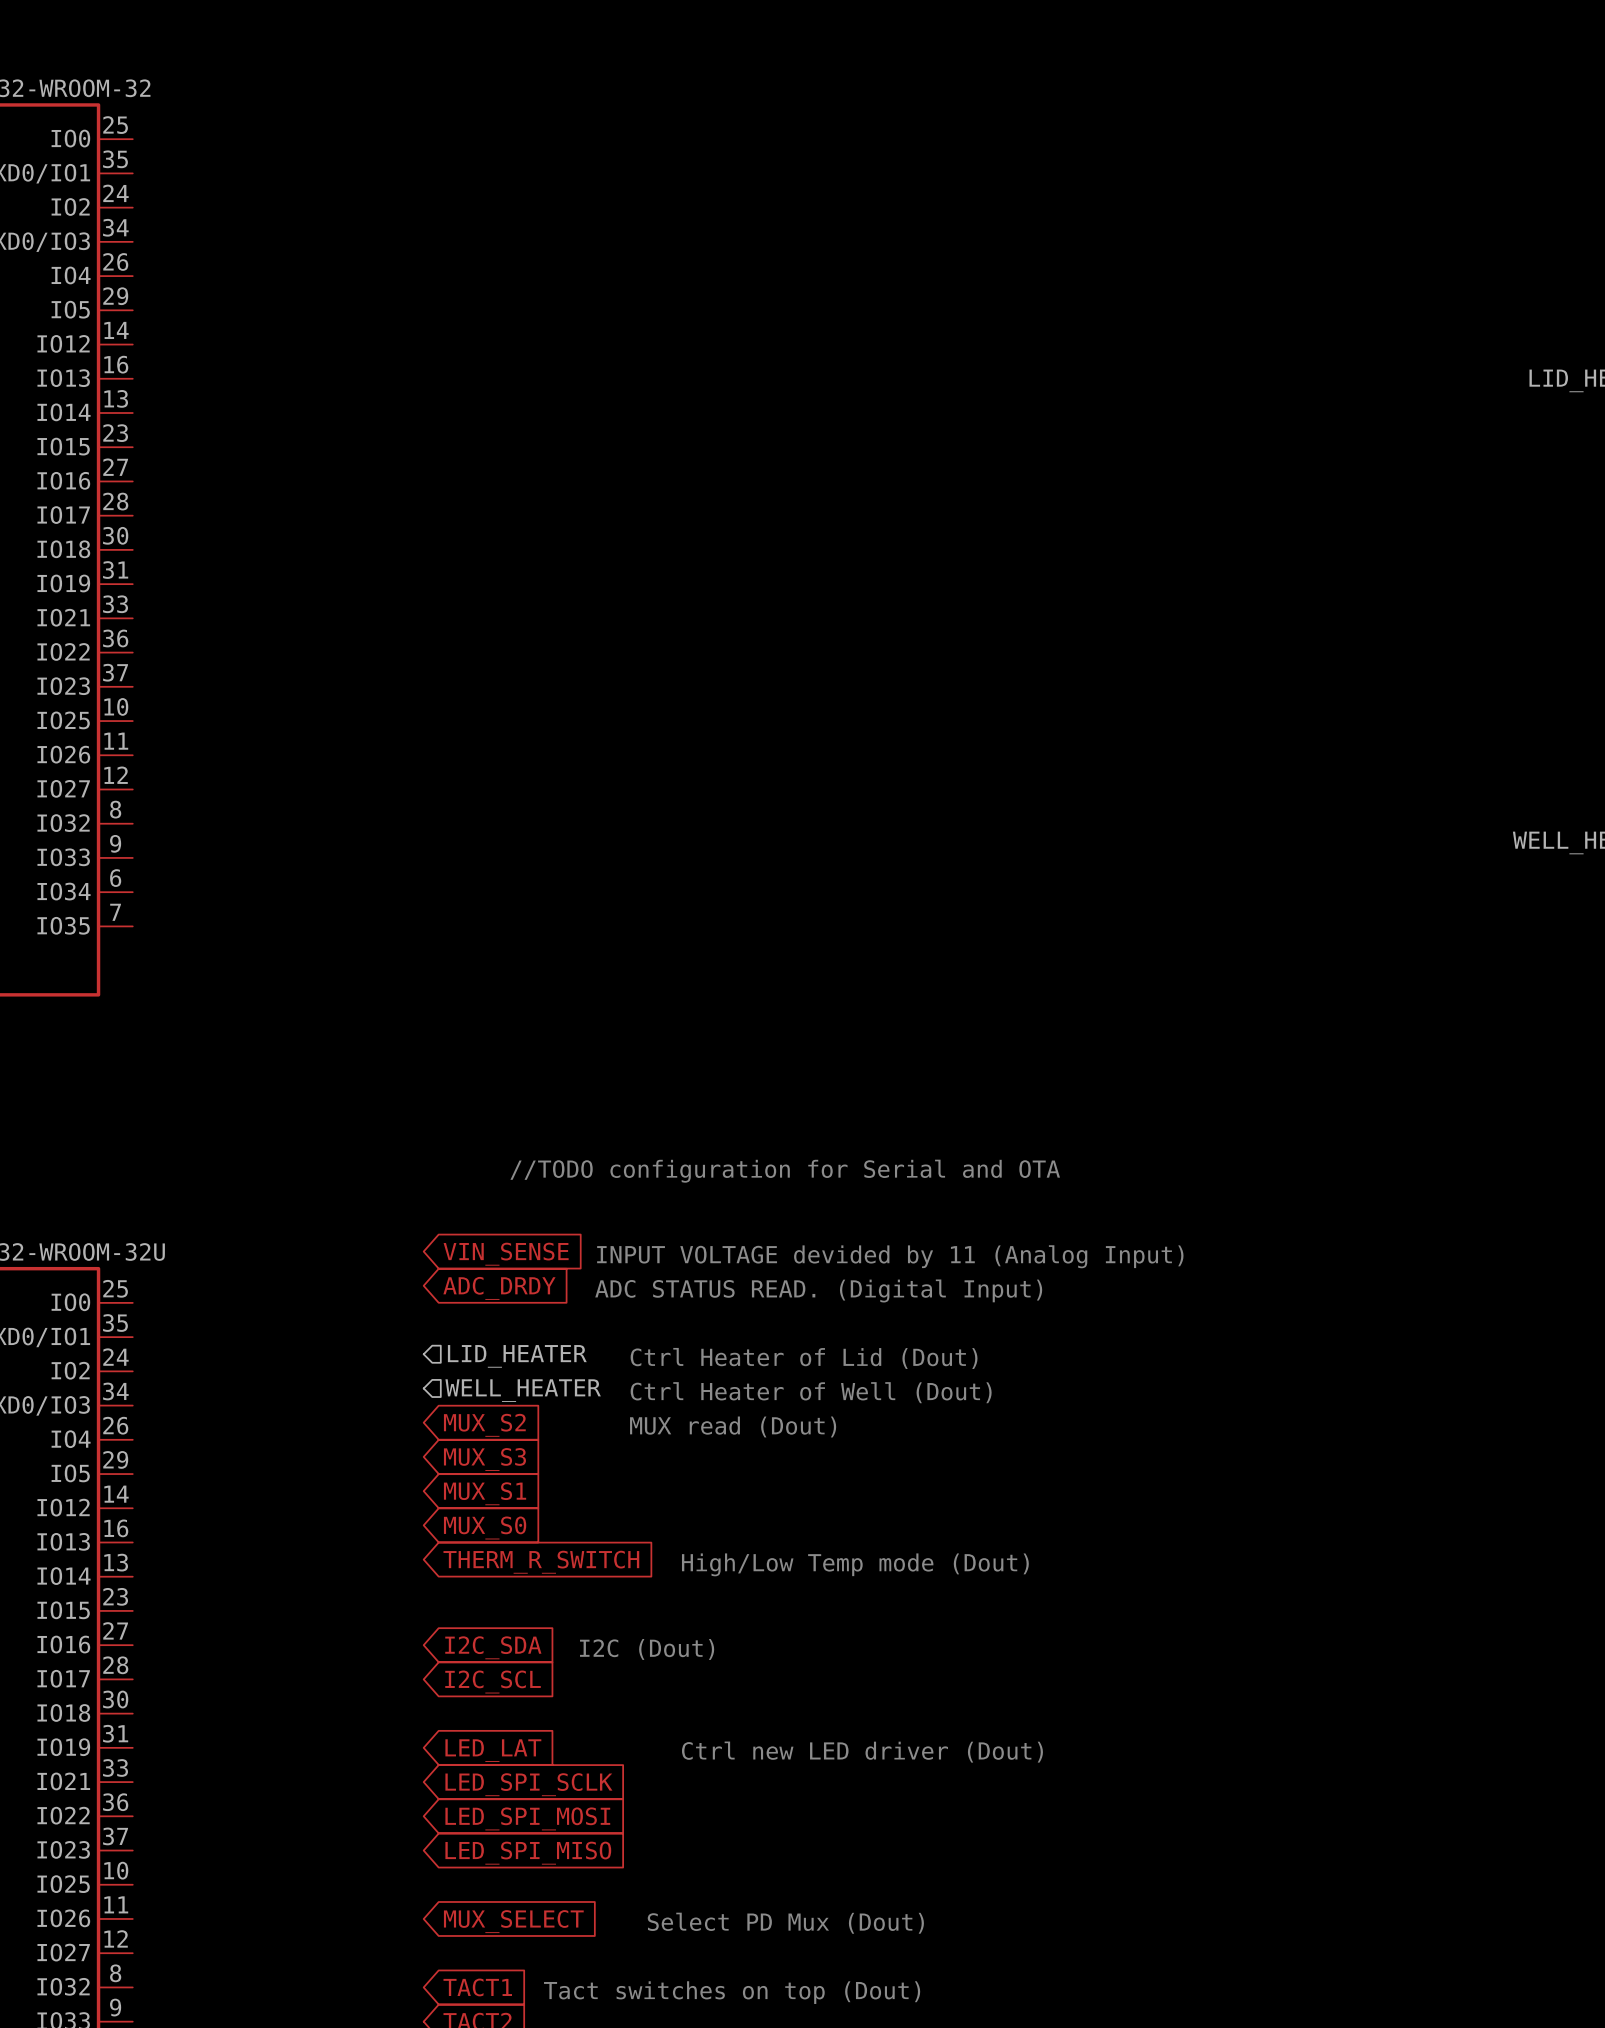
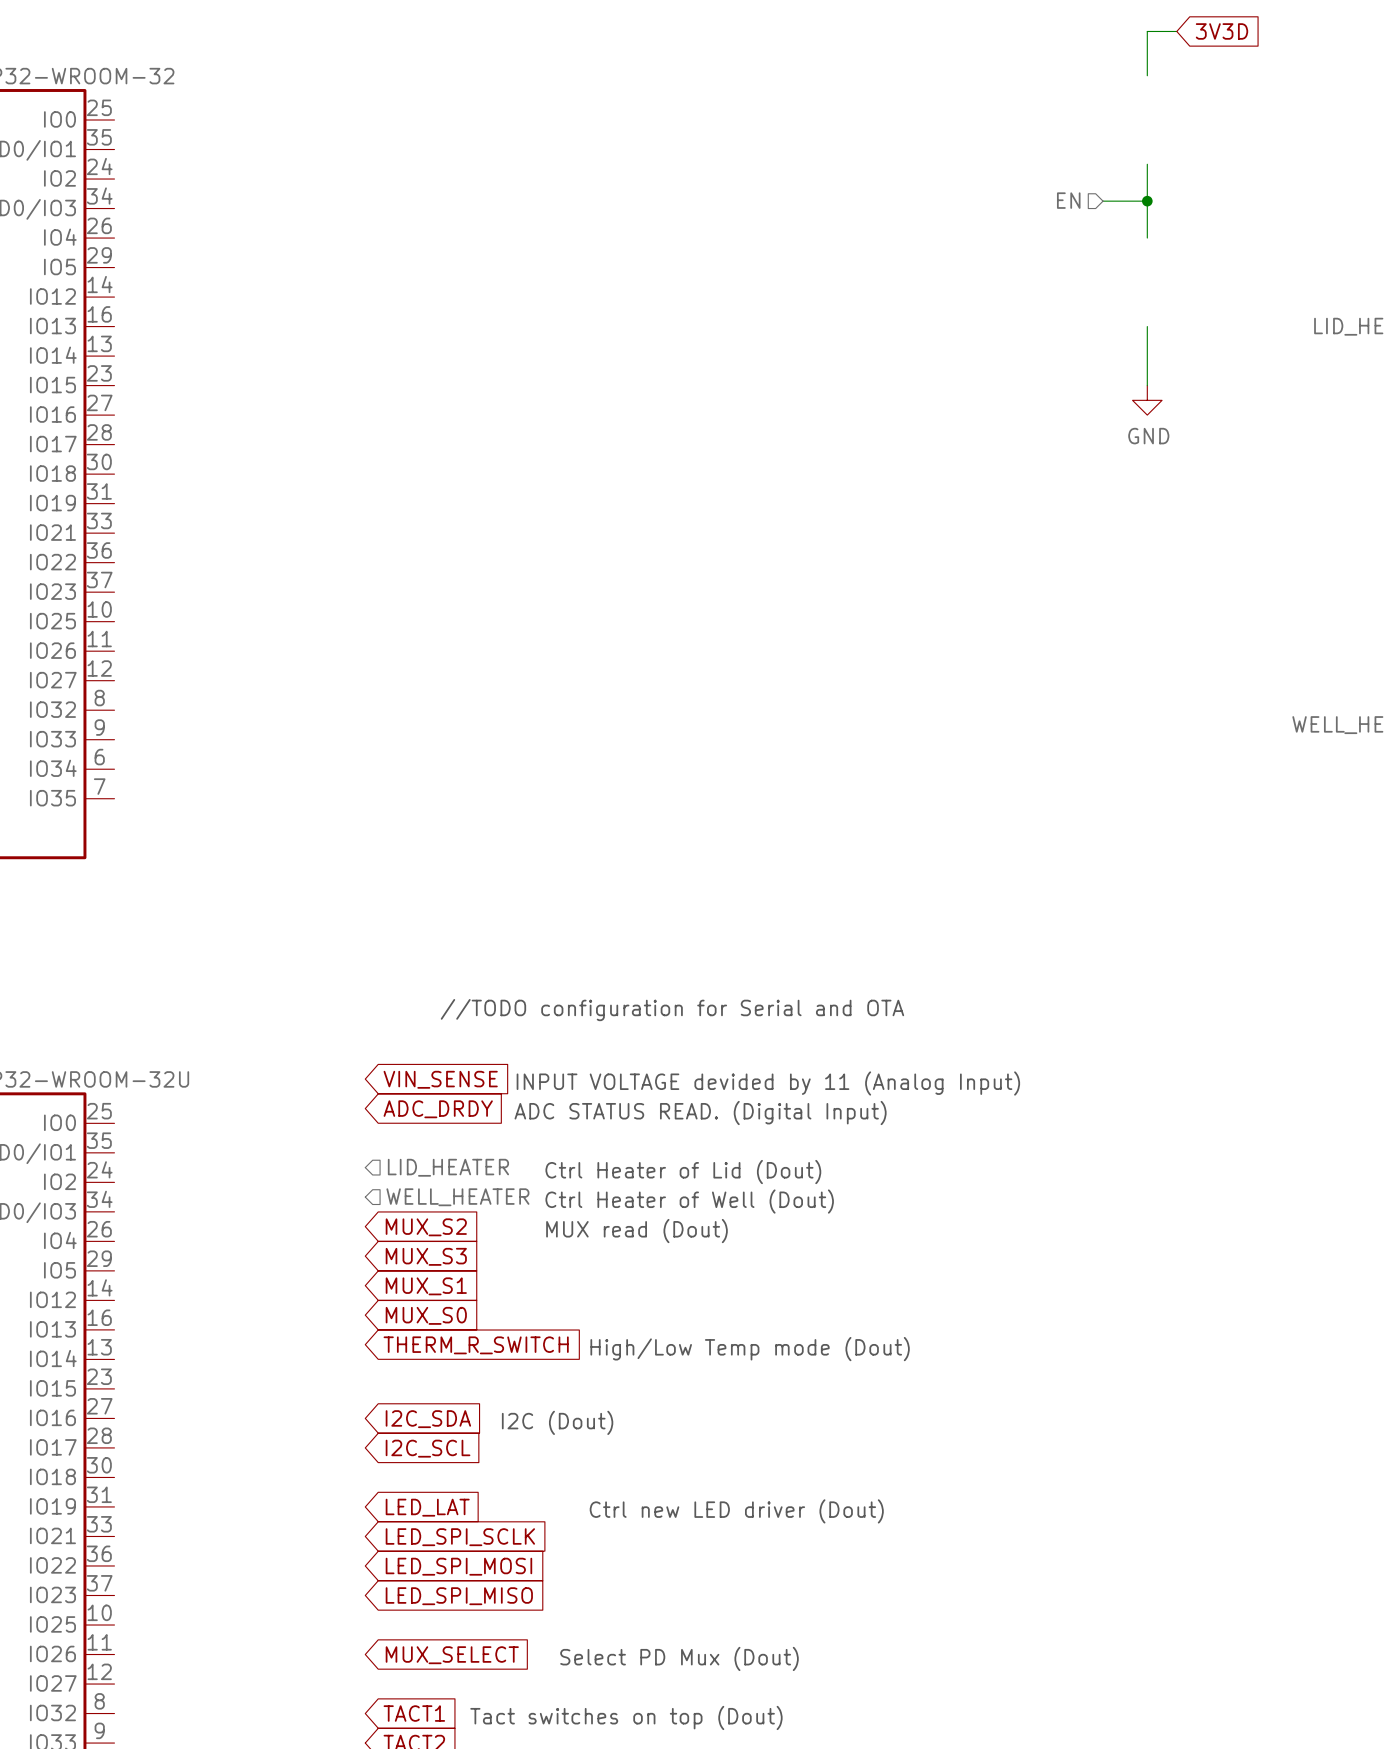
wire: none -> (1176, 31) (1147, 31) (1147, 75)
global label: none -> 3V3D (1221, 31)
wire: none -> (1147, 164) (1147, 238)
hierarchical label: none -> EN (1068, 200)
wire: none -> (1103, 201) (1147, 201)
junction: none -> (1147, 201)
wire: none -> (1147, 326) (1147, 385)
power symbol: none -> GND (1147, 400)

